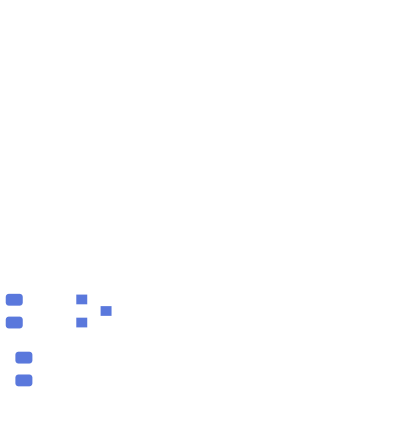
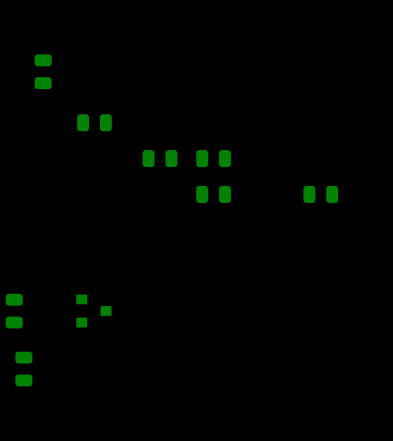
part: none -> (43, 71)
part: none -> (94, 122)
part: none -> (159, 158)
part: none -> (213, 158)
part: none -> (213, 194)
part: none -> (320, 194)

